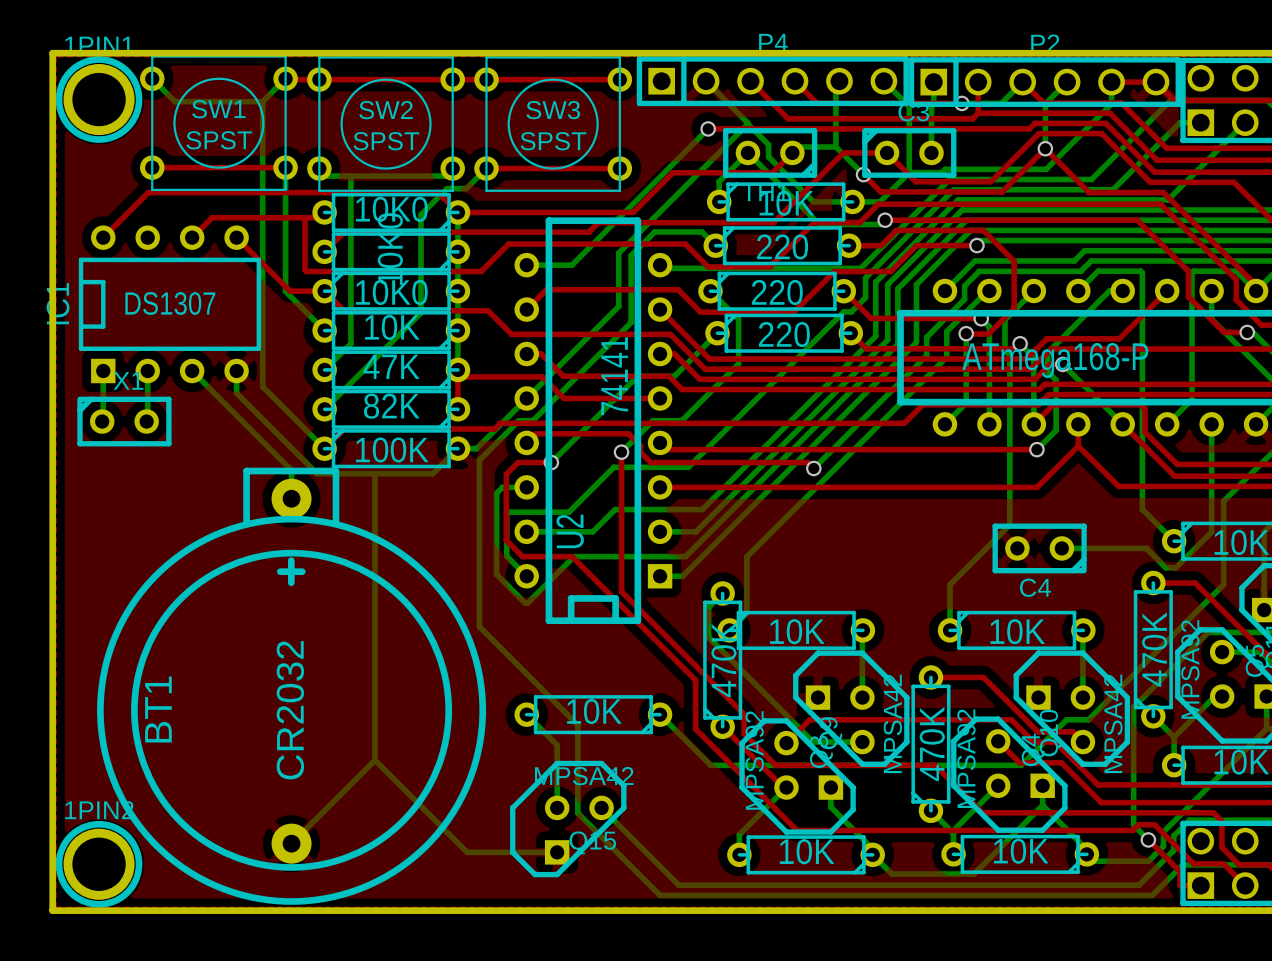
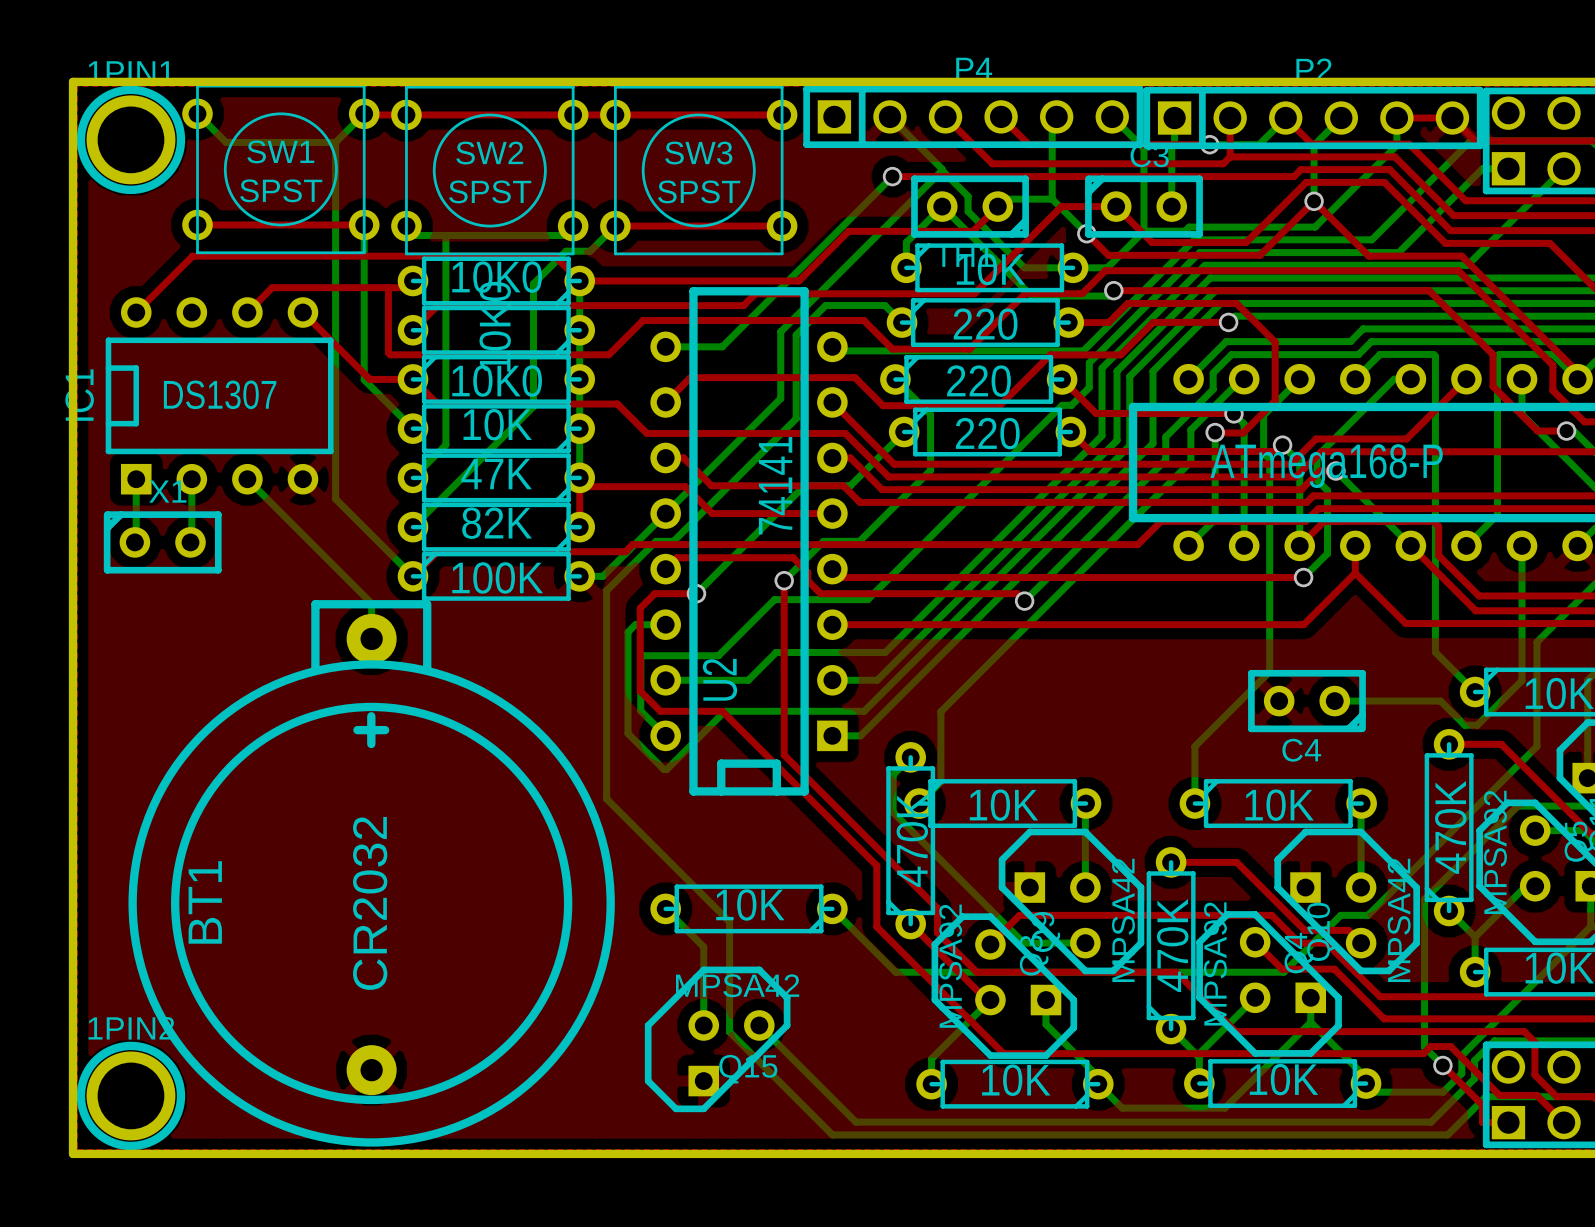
bottom track: (236, 371) (236, 393) (317, 473) (432, 473) (457, 448) -> none
bottom track: (375, 473) (375, 760) -> none
bottom track: (375, 760) (467, 852) (557, 852) -> none
bottom track: (375, 760) (291, 843) -> none

